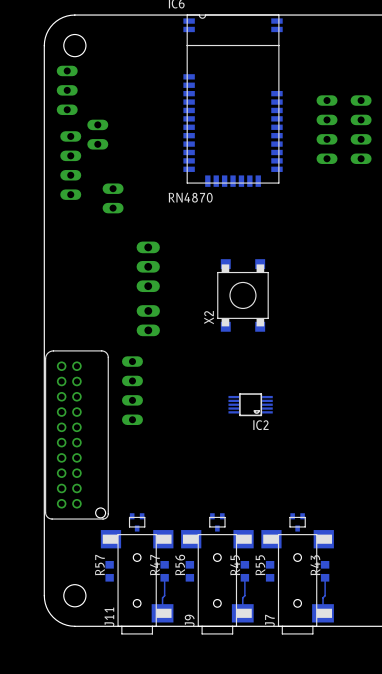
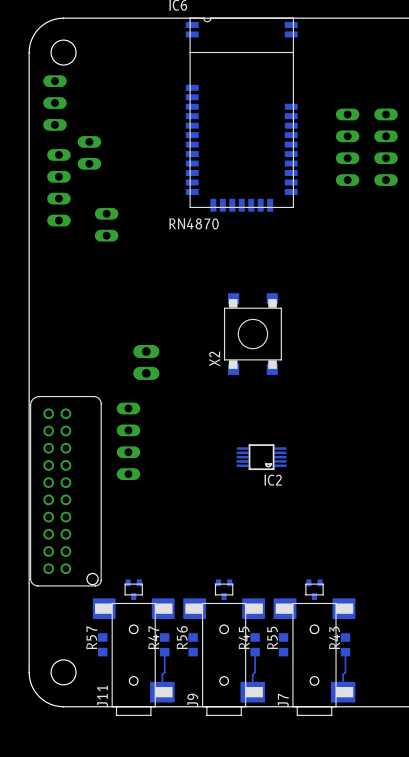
part: (148, 266) -> none

